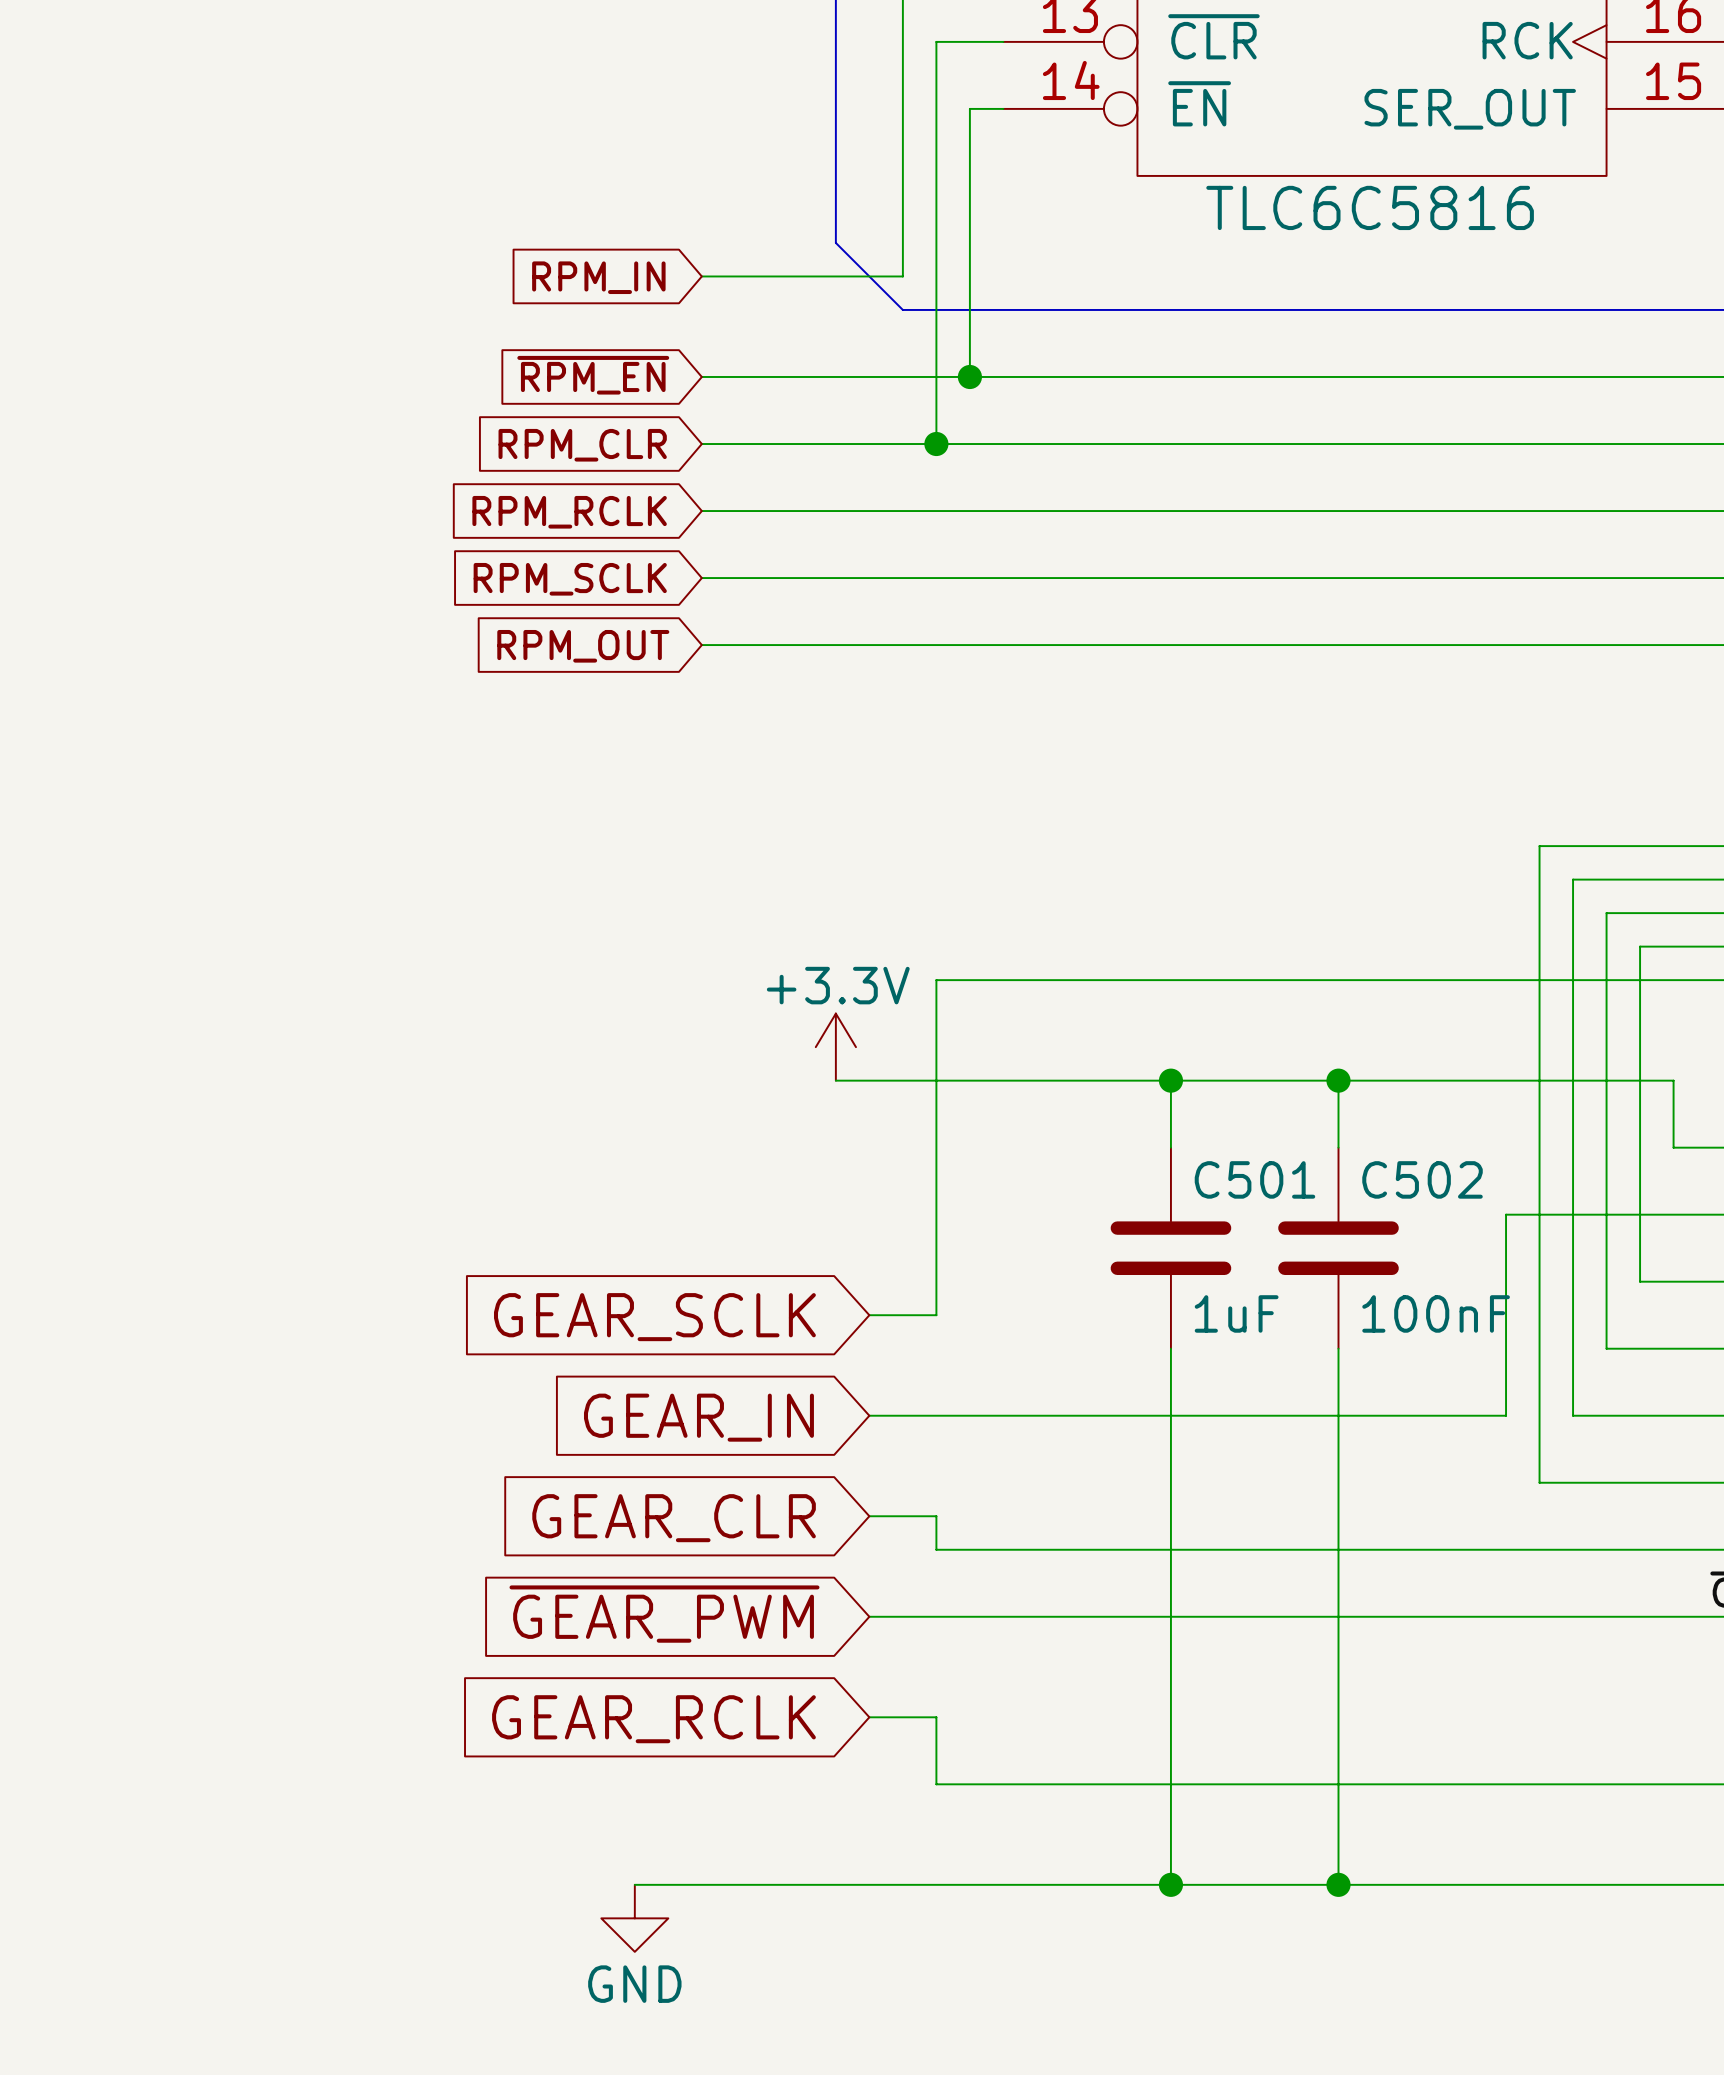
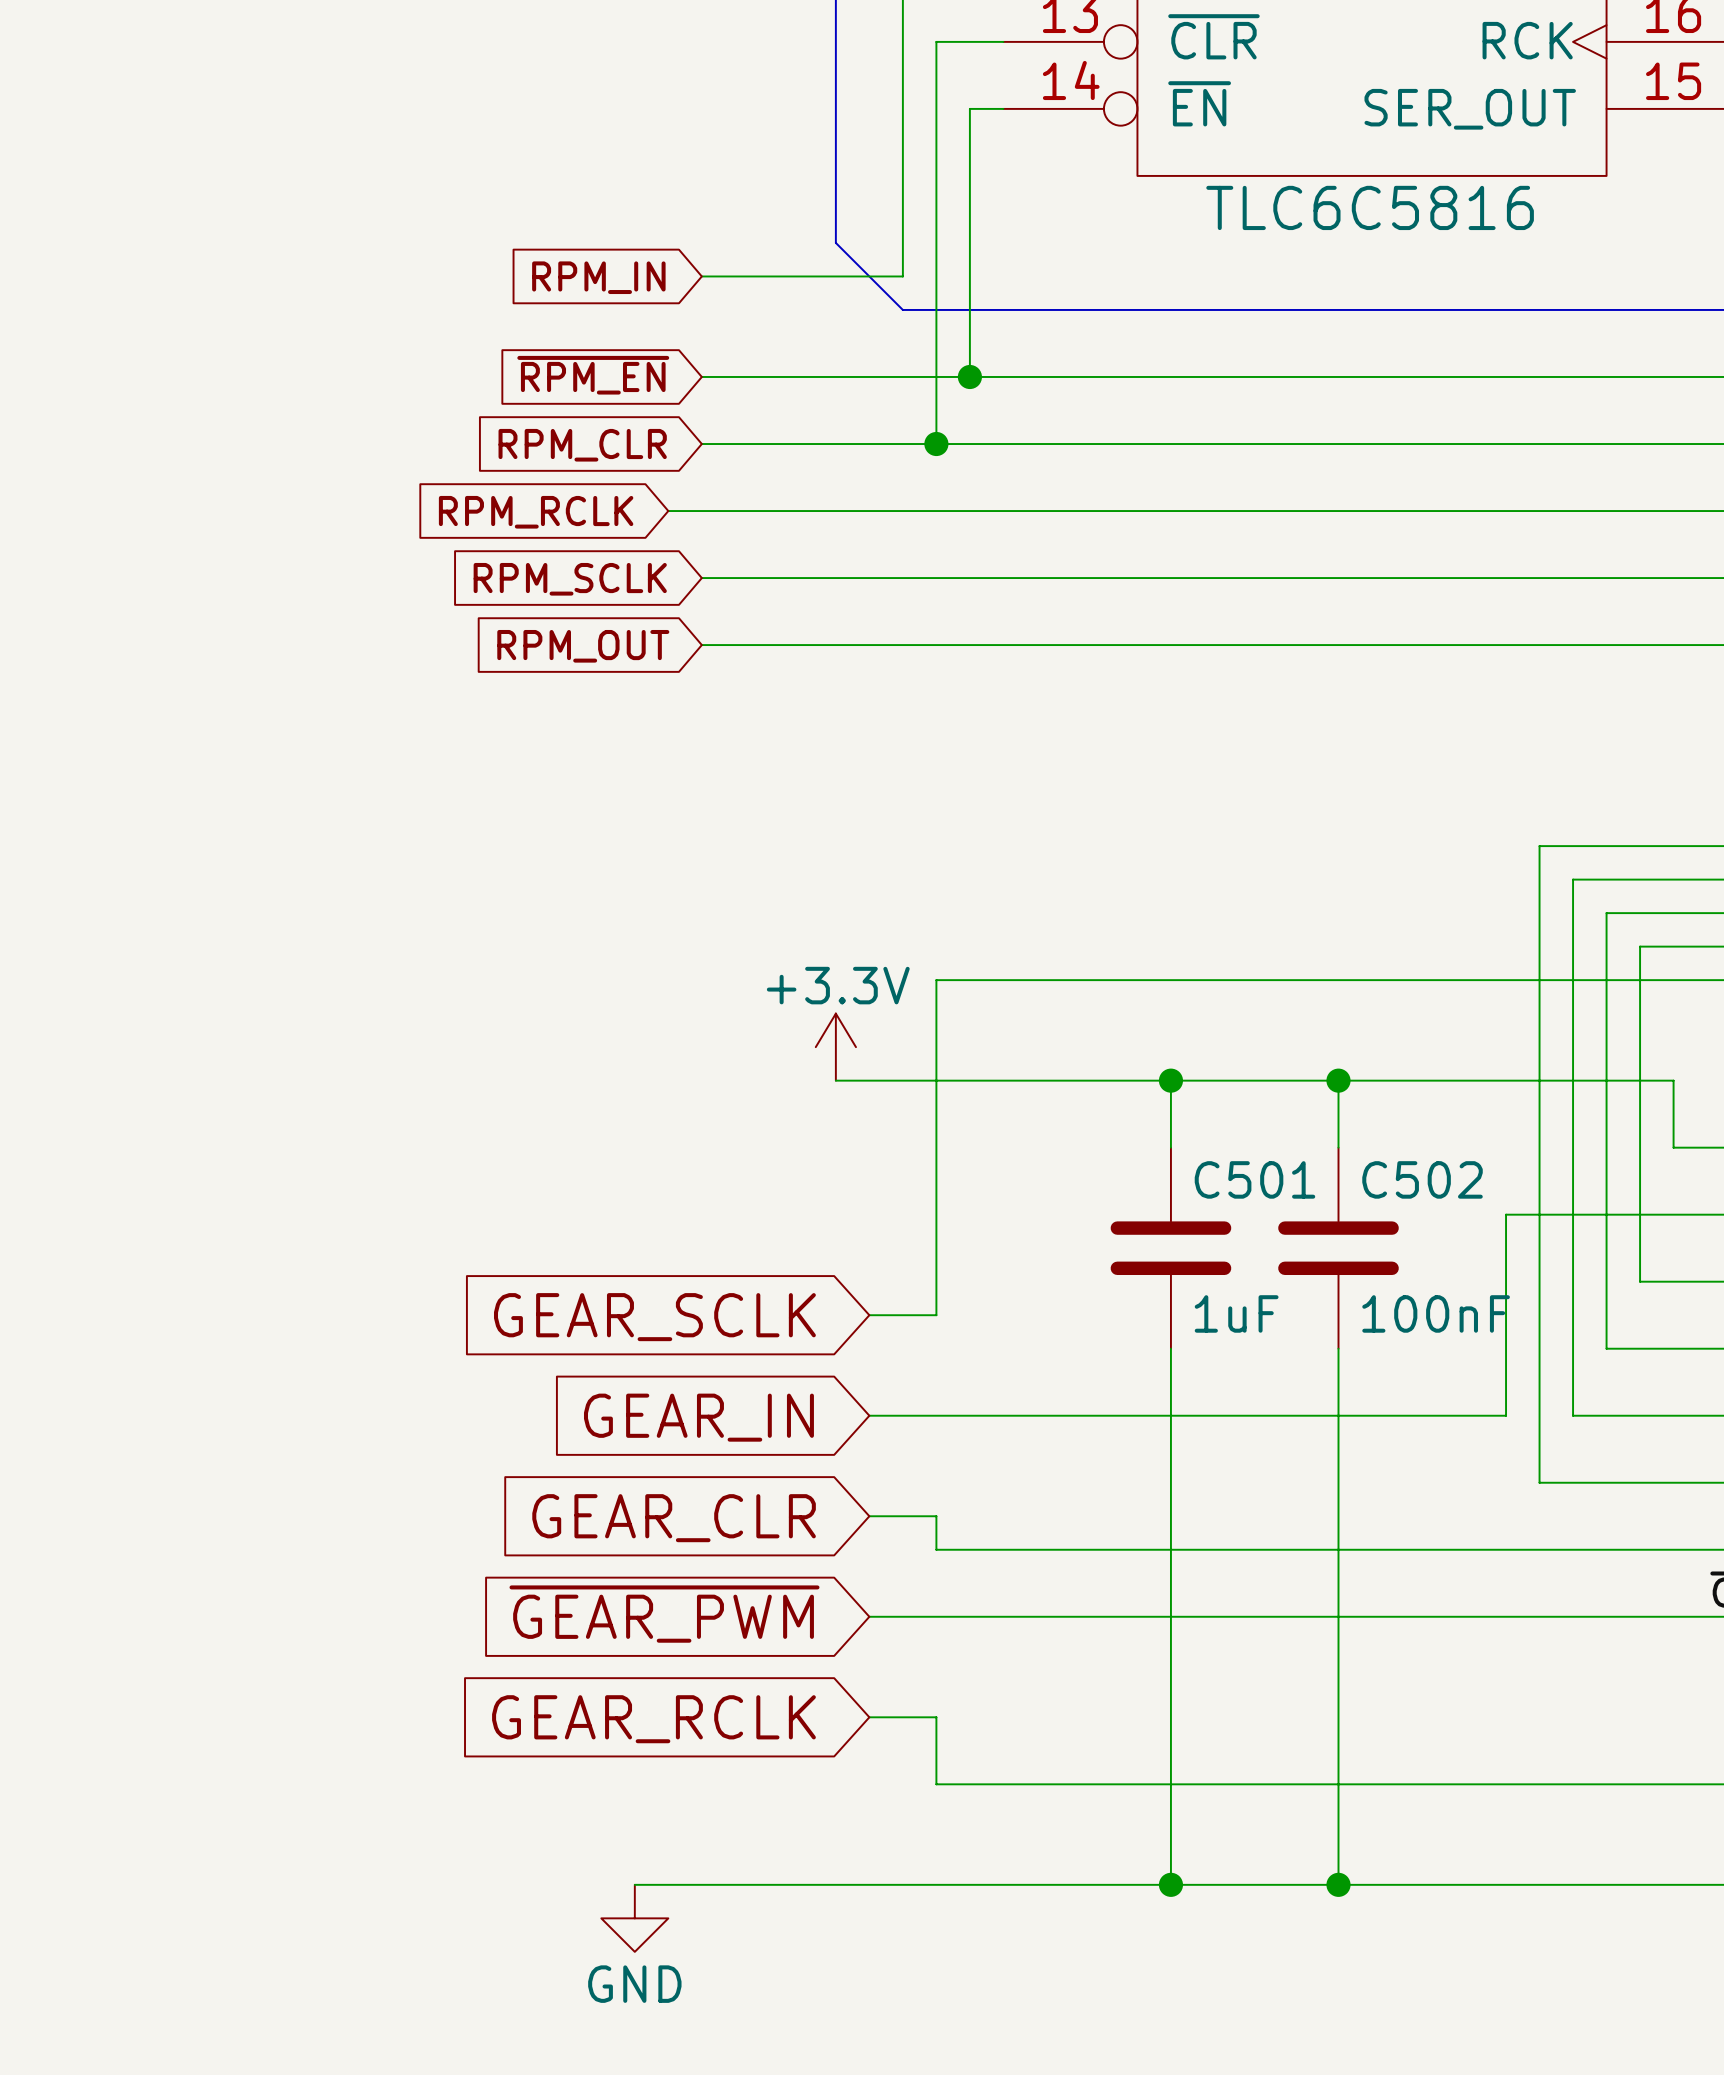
wire: none -> (668, 511) (701, 511)
global label position: RPM_RCLK (569, 512) -> RPM_RCLK (536, 512)

